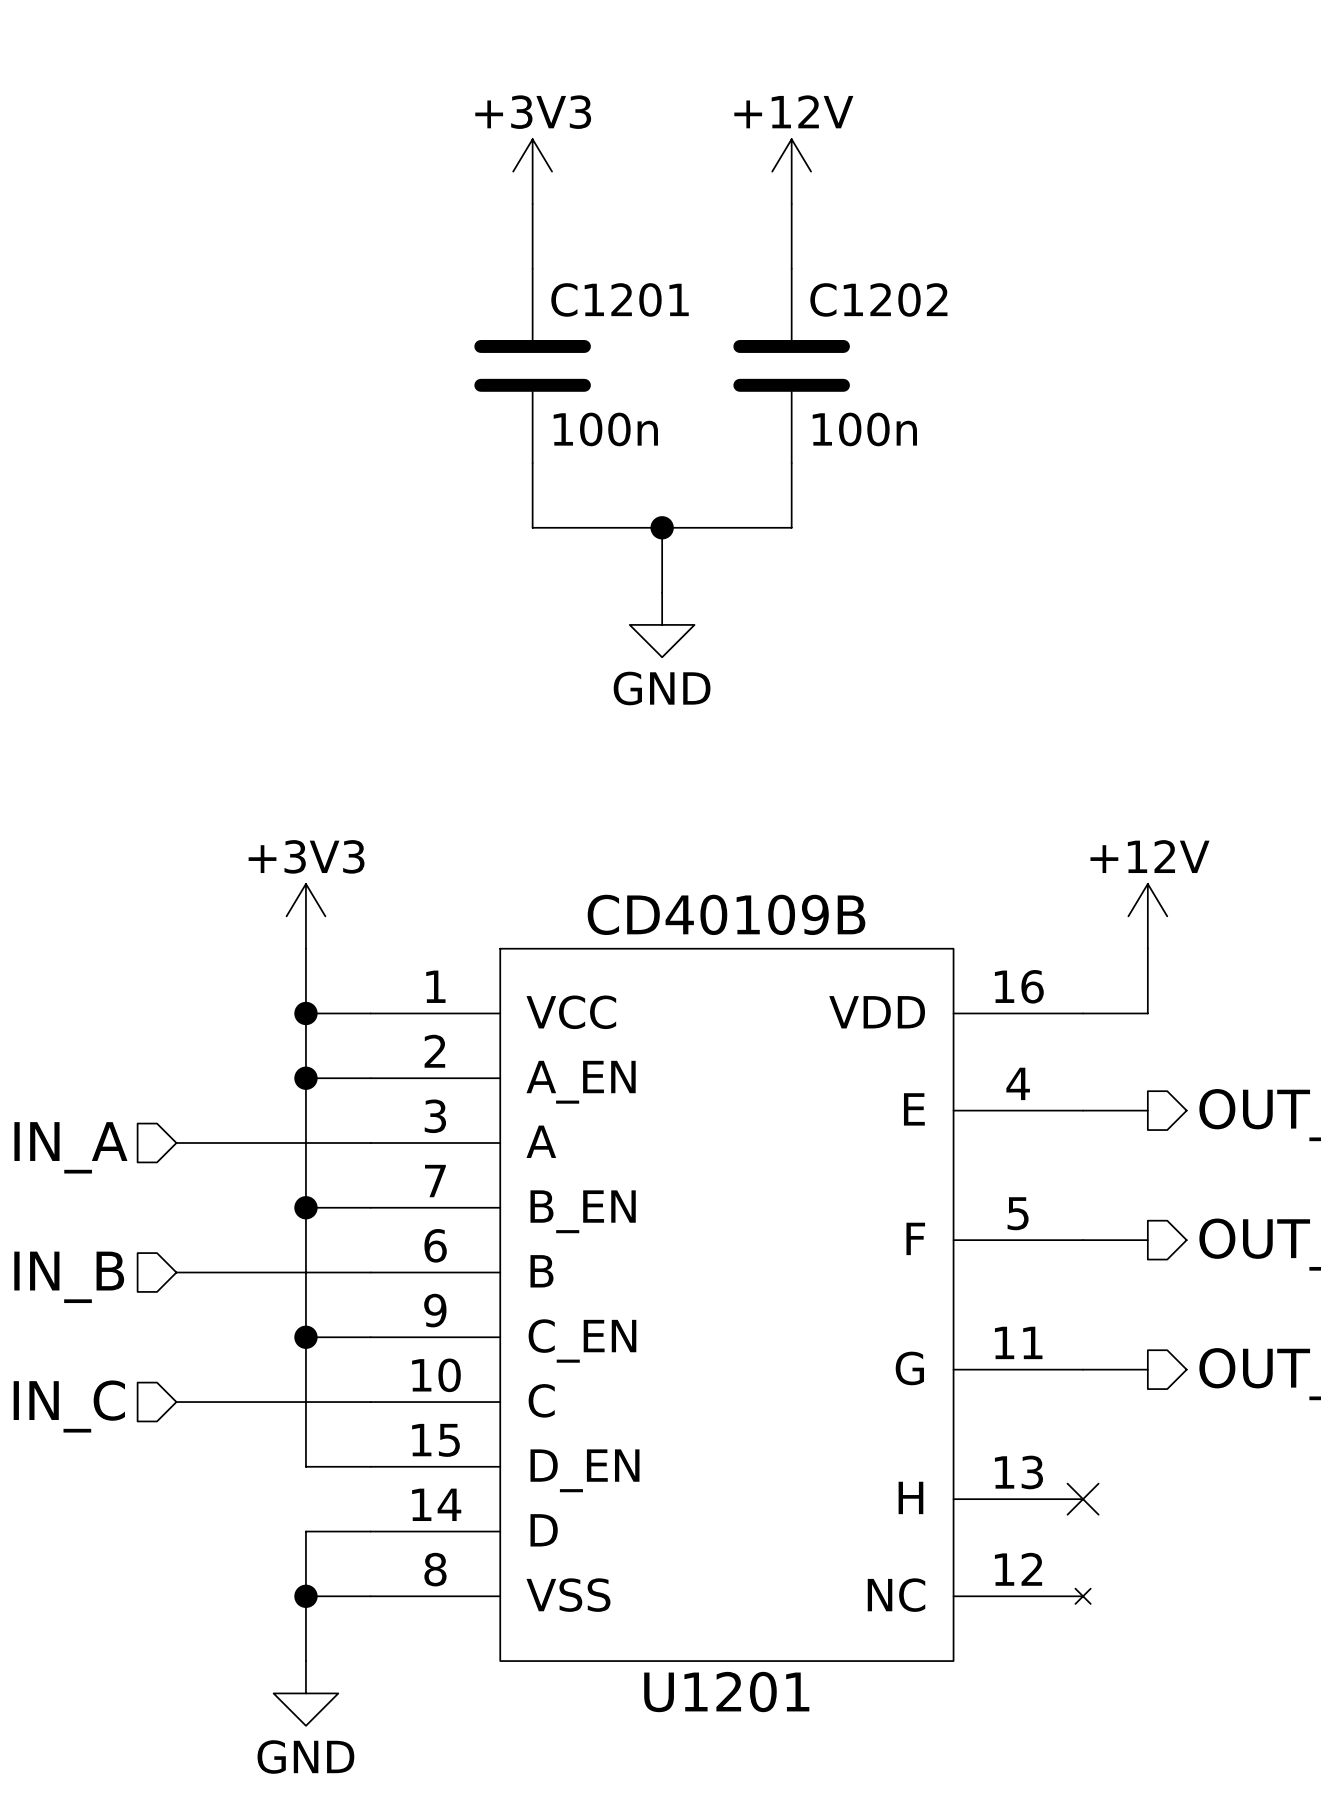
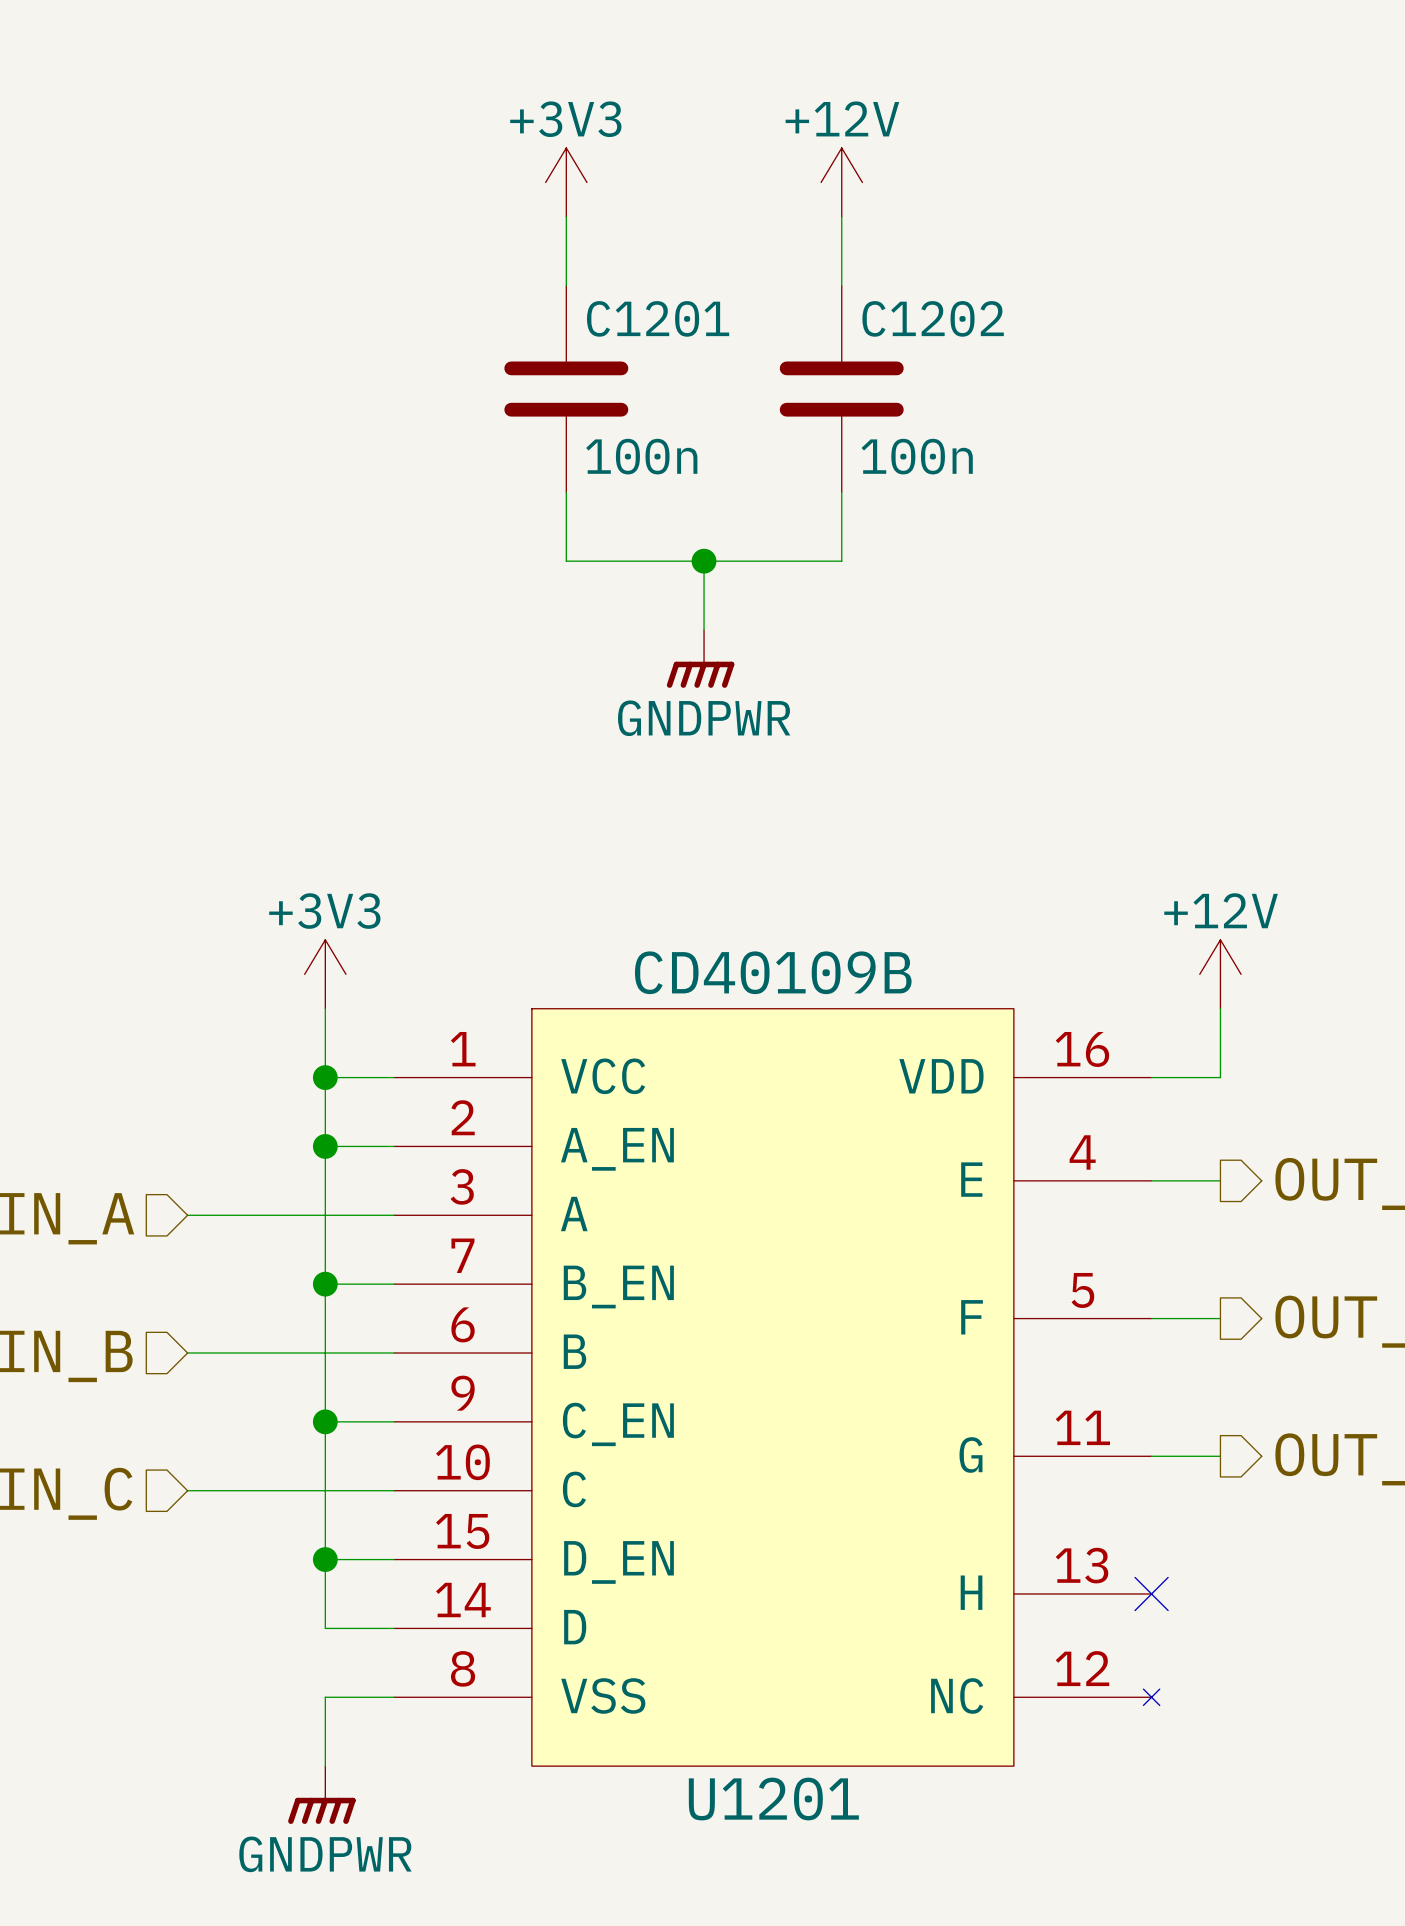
power symbol: GND (662, 624) -> GNDPWR (700, 658)
wire: (305, 1531) (305, 1596) -> (325, 1628) (325, 1559)
junction position: (305, 1596) -> (325, 1559)
power symbol: GND (305, 1693) -> GNDPWR (321, 1795)

